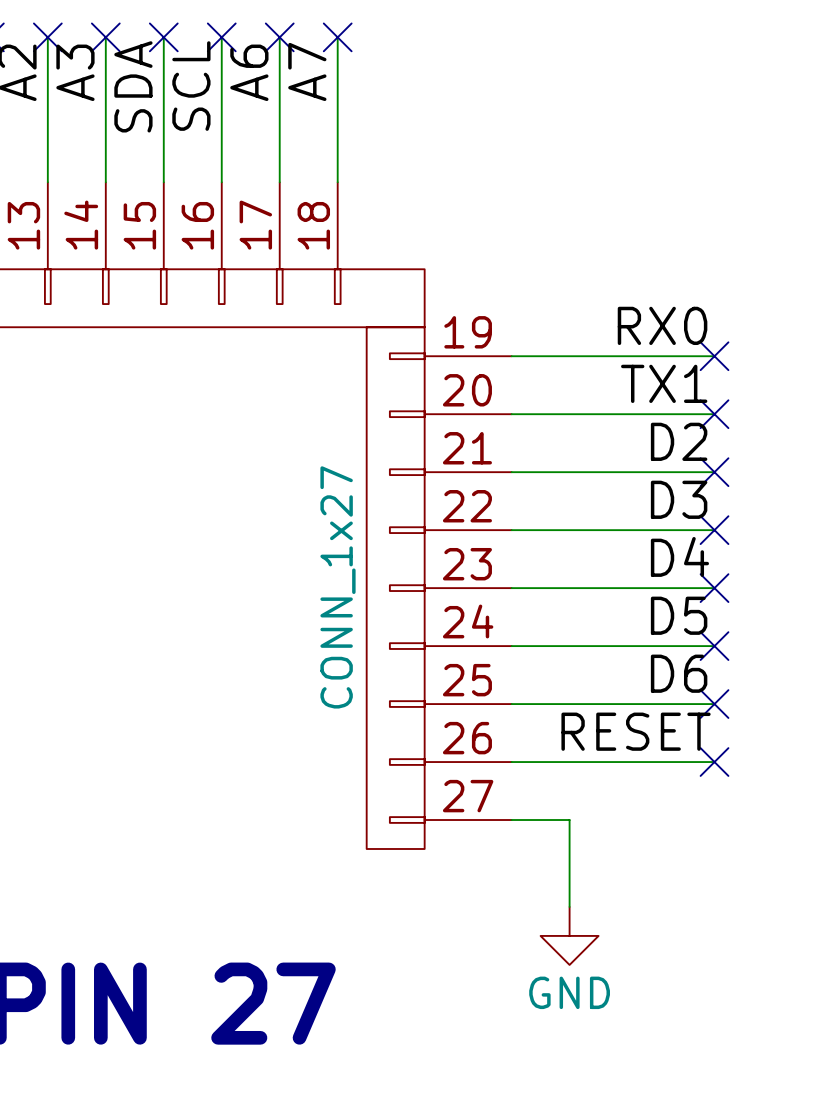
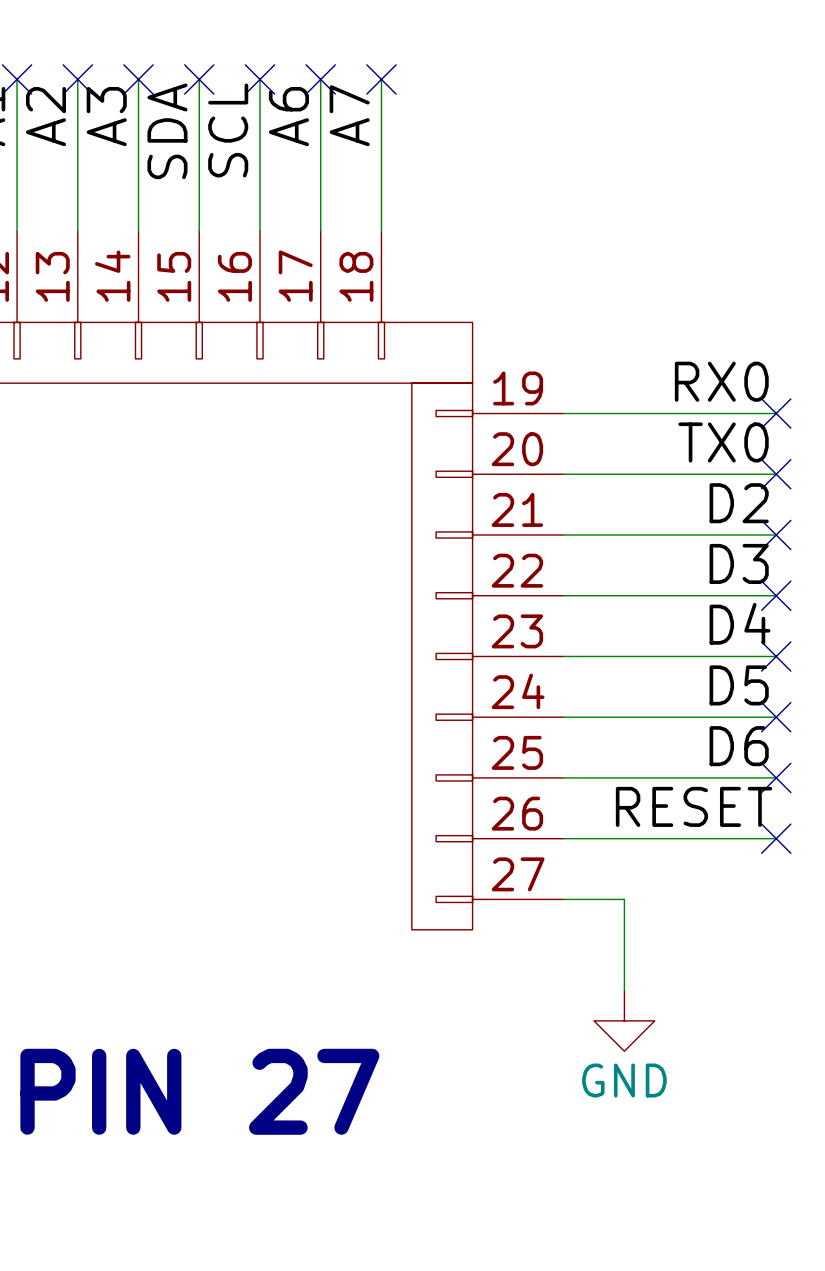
label: TX1 (664, 383) -> TX0 (723, 442)
part value: CONN_1x27 (337, 587) -> none

